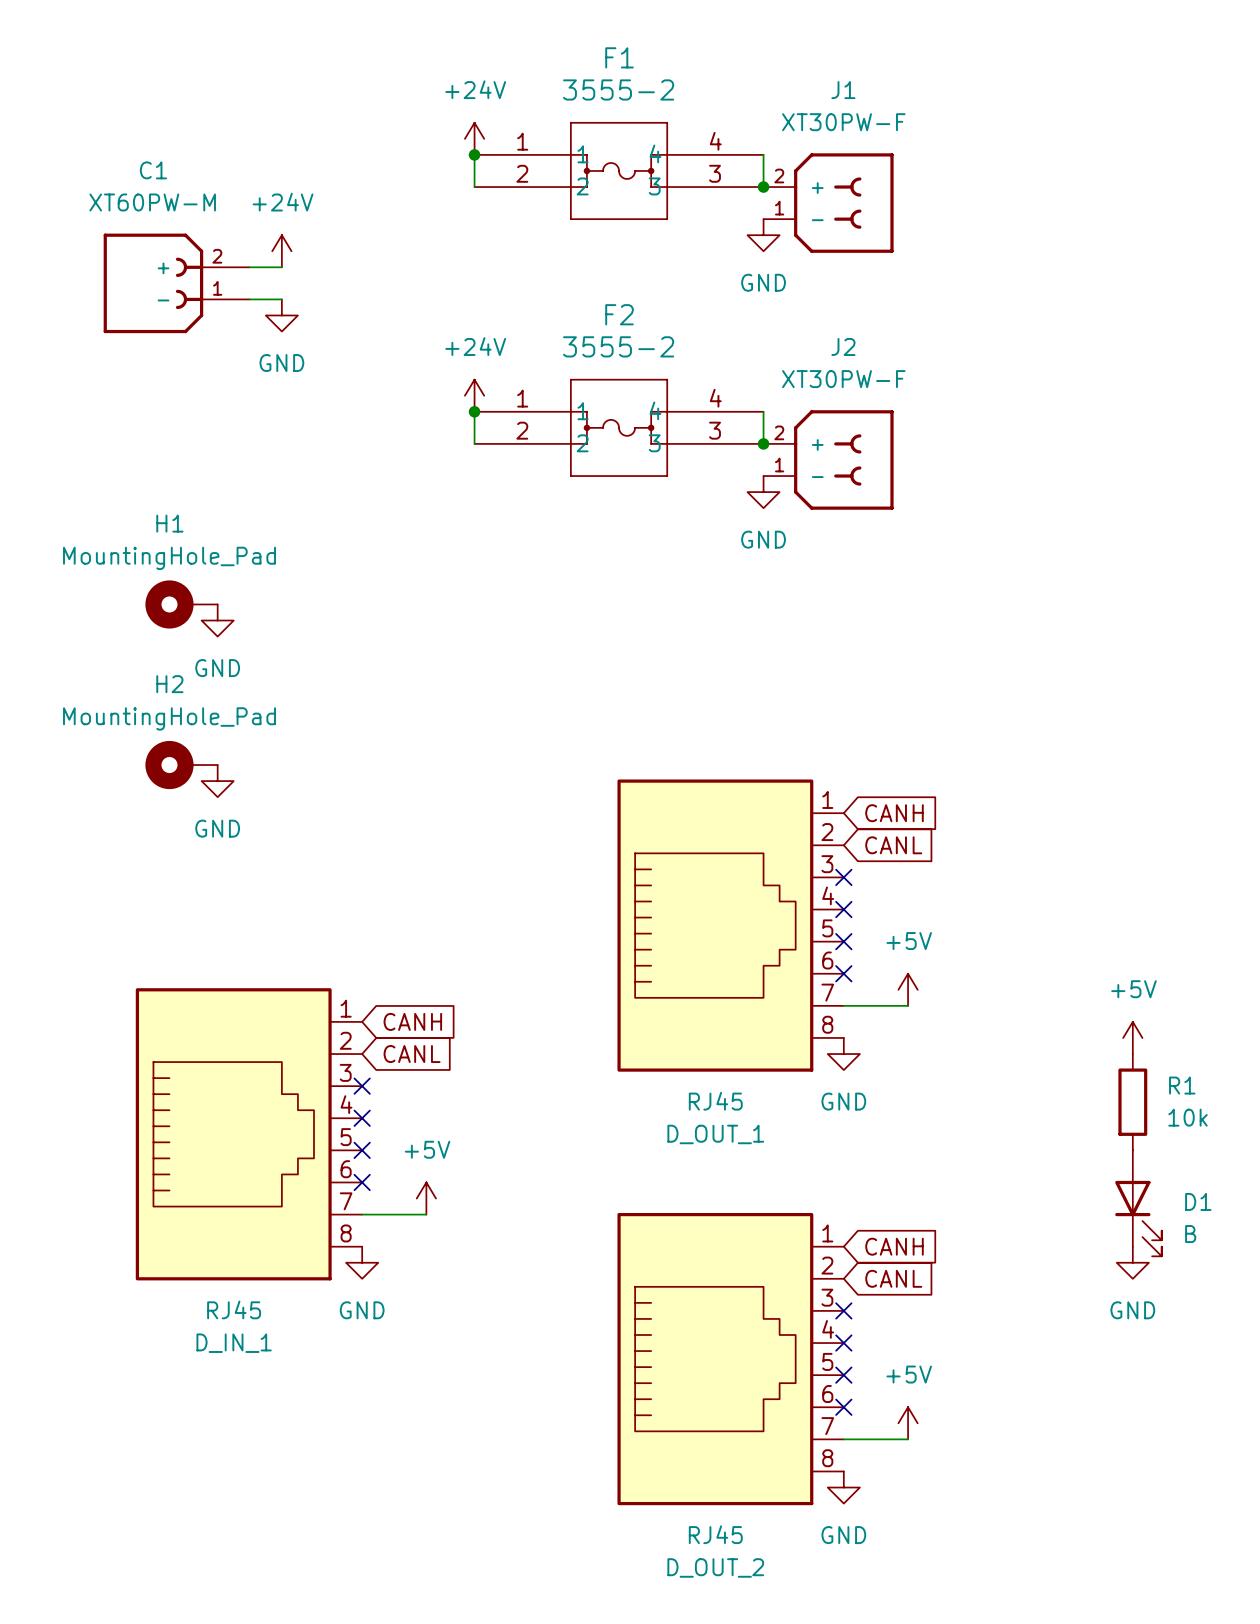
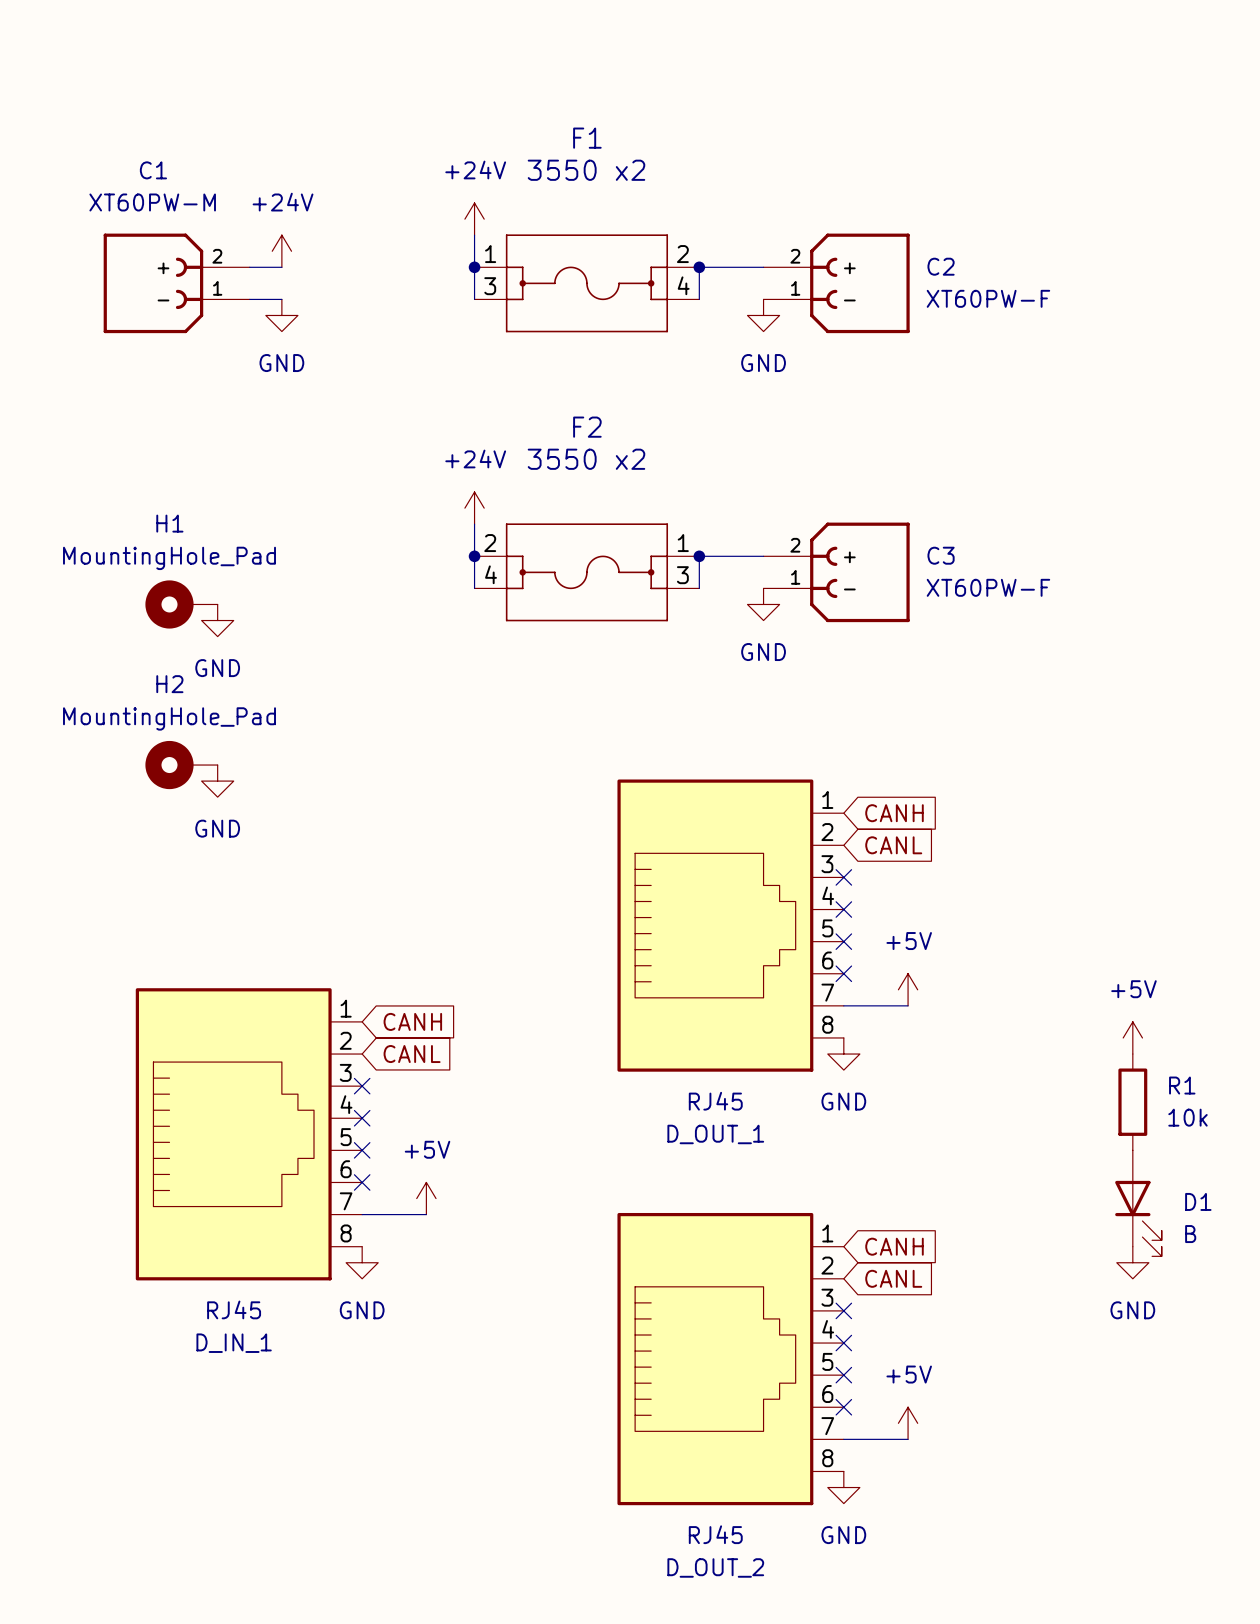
F1 name position: F1 (619, 57) -> F1 (587, 138)
F1 value: 3555-2 (618, 89) -> 3550 x2 (586, 170)
F1 symbol: [474, 122, 764, 220] -> [474, 234, 700, 333]
power symbol position: +24V (474, 138) -> +24V (474, 219)
wire: (474, 154) (474, 187) -> none
junction: (474, 154) -> none
wire: (763, 154) (763, 187) -> none
junction: (763, 187) -> none
J1: XT30PW-F (828, 203) -> none
wire: none -> (474, 235) (474, 299)
power symbol position: GND (763, 235) -> GND (763, 315)
junction: none -> (474, 267)
junction: none -> (699, 267)
wire: none -> (763, 267) (699, 267) (699, 299)
C2: none -> XT60PW-F (836, 283)
F2 name position: F2 (619, 314) -> F2 (587, 427)
F2 value: 3555-2 (618, 346) -> 3550 x2 (586, 459)
F2 symbol: [474, 378, 764, 477] -> [474, 523, 700, 622]
power symbol: +24V (474, 395) -> none
wire: (474, 411) (474, 443) -> none
junction: (474, 411) -> none
wire: (763, 411) (763, 443) -> none
junction: (763, 443) -> none
J2: XT30PW-F (828, 459) -> none
power symbol: GND (763, 492) -> none
power symbol: none -> +24V (474, 508)
wire: none -> (474, 524) (474, 588)
junction: none -> (474, 556)
junction: none -> (699, 556)
wire: none -> (763, 556) (699, 556) (699, 588)
C3: none -> XT60PW-F (836, 572)
power symbol: none -> GND (763, 604)

